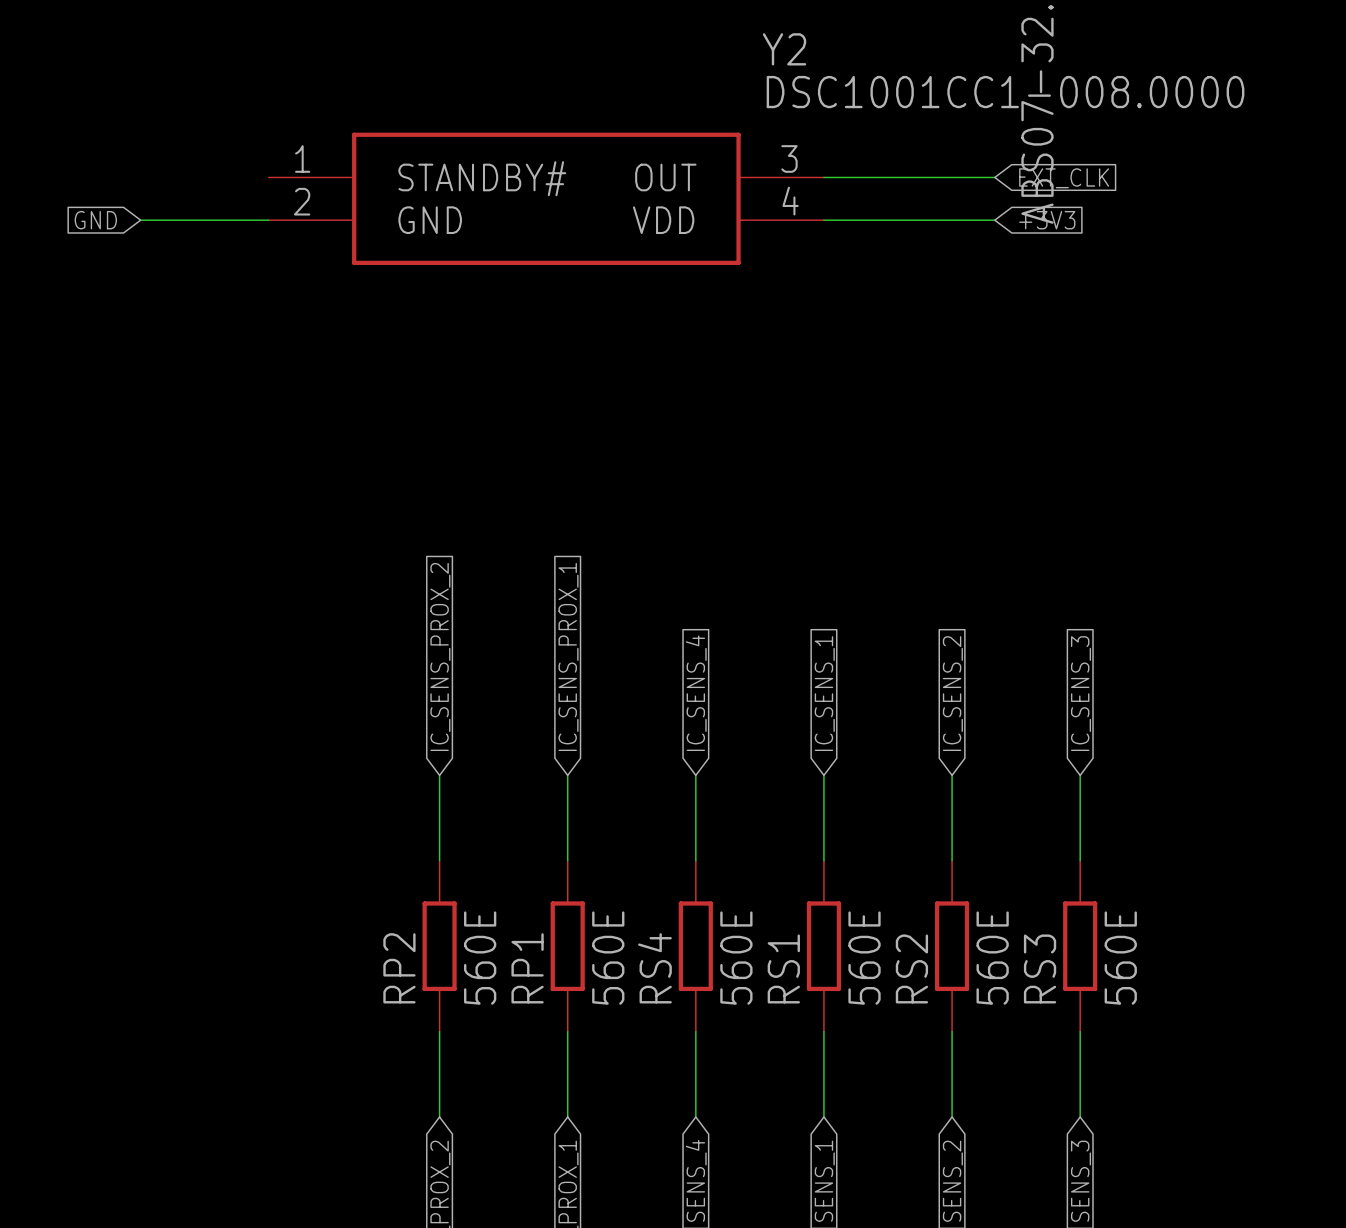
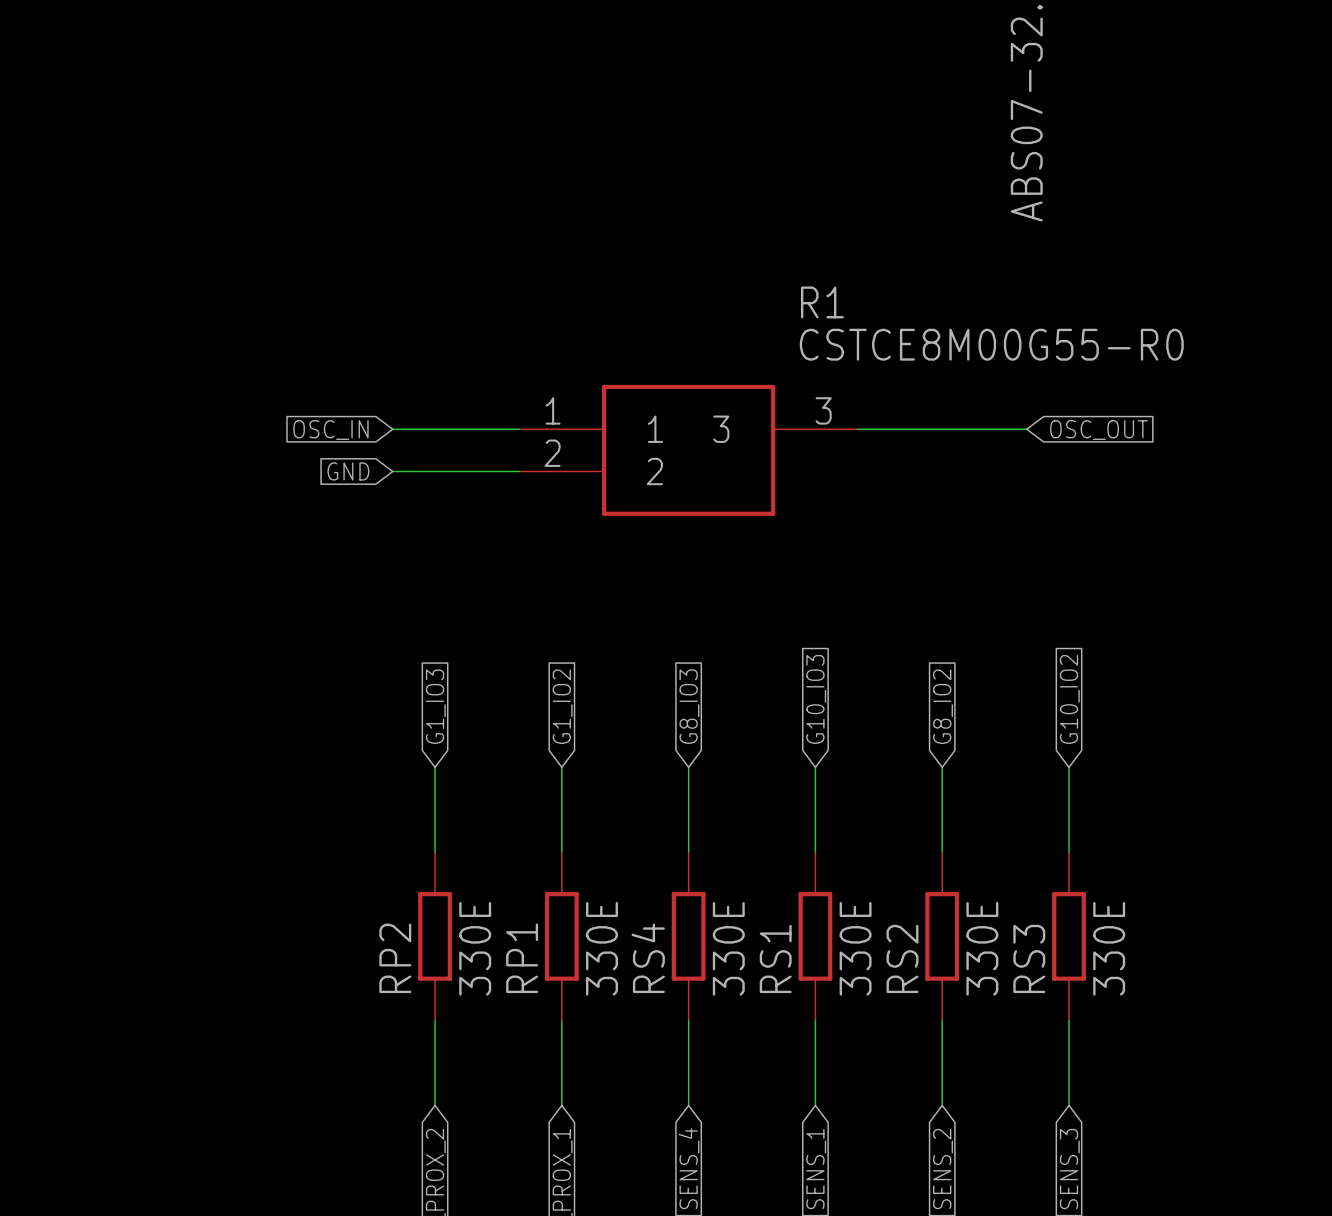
wire: (823, 177) (994, 177) -> none
global label: EXT_CLK (1064, 178) -> none
Y2: DSC1001CC1-008.0000 (546, 198) -> none
global label position: GND (95, 220) -> GND (348, 471)
wire: (140, 220) (268, 220) -> (392, 429) (519, 429)
wire: (823, 220) (994, 220) -> (857, 429) (1026, 429)
global label: +3V3 (1047, 220) -> none
global label: none -> OSC_IN (331, 430)
global label: none -> OSC_OUT (1099, 430)
R1: none -> CSTCE8M00G55-R0 (688, 450)
wire: none -> (392, 471) (519, 471)
global label: IC_SENS_PROX_2 (440, 656) -> G1_IO3 (435, 706)
global label: IC_SENS_PROX_1 (568, 656) -> G1_IO2 (562, 706)
global label: IC_SENS_4 (696, 693) -> G8_IO3 (689, 706)
global label: IC_SENS_1 (824, 693) -> G10_IO3 (816, 699)
global label: IC_SENS_2 (952, 693) -> G8_IO2 (943, 706)
global label: IC_SENS_3 (1081, 693) -> G10_IO2 (1069, 699)
RP2 value: 560E (480, 958) -> 330E (475, 948)
RP1 value: 560E (608, 958) -> 330E (601, 948)
RS4 value: 560E (736, 958) -> 330E (728, 948)
RS1 value: 560E (864, 958) -> 330E (855, 948)
RS2 value: 560E (992, 958) -> 330E (982, 948)
RS3 value: 560E (1120, 958) -> 330E (1109, 948)

